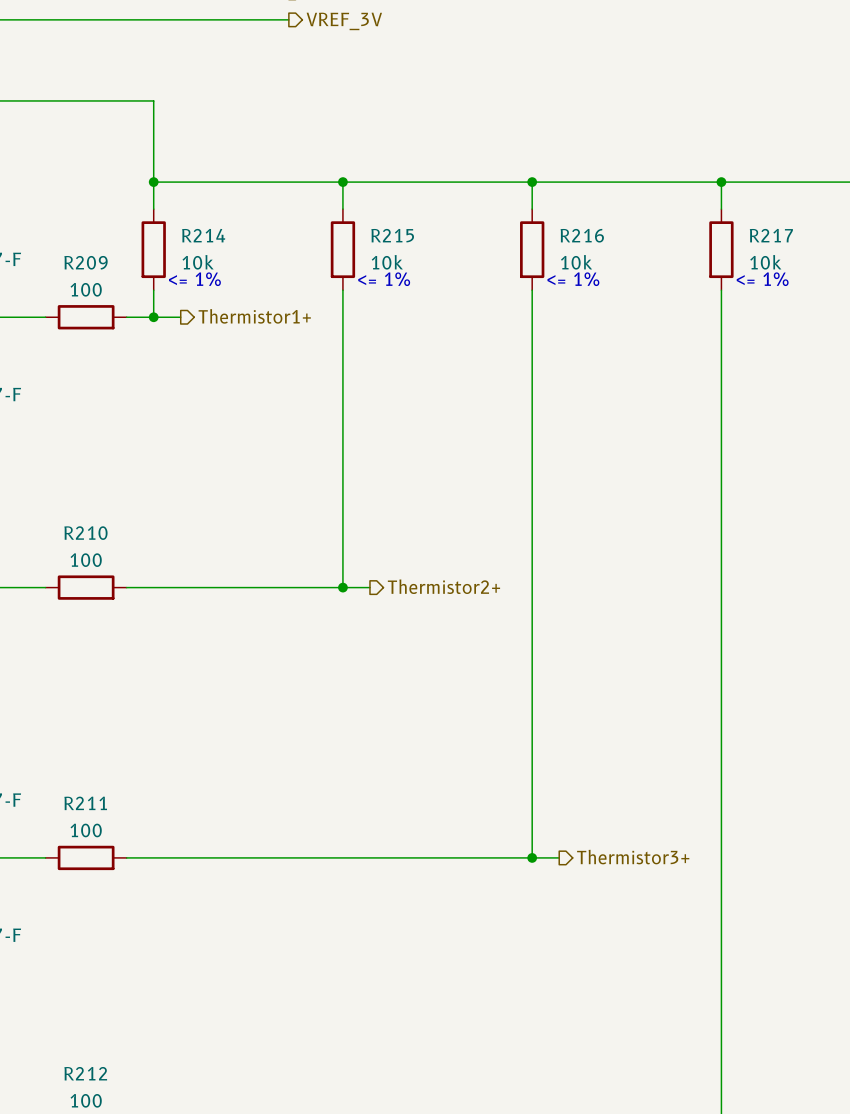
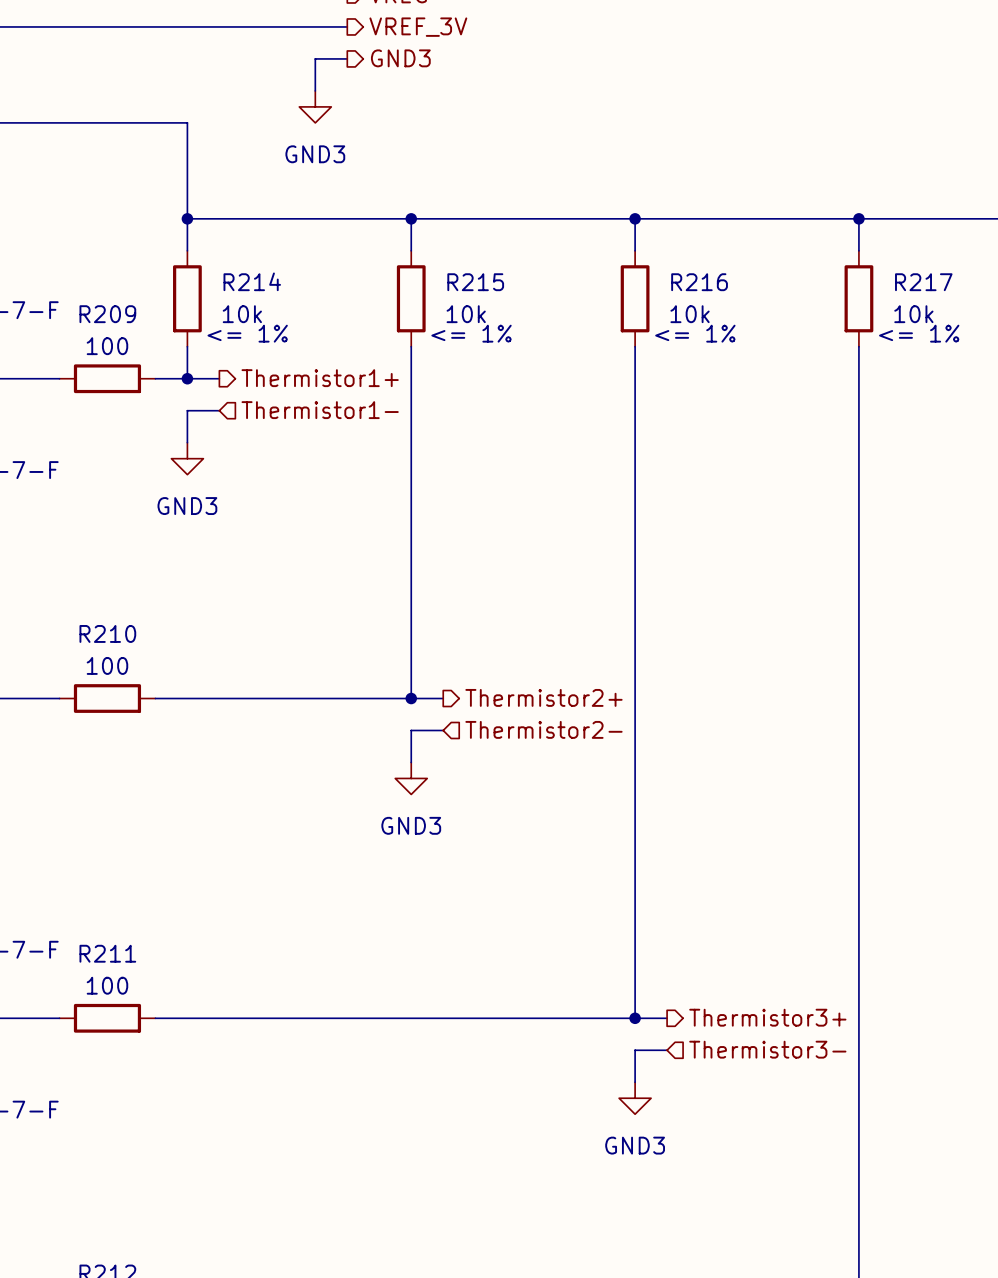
wire: none -> (347, 58) (315, 58) (315, 90)
hierarchical label: none -> GND3 (400, 58)
power symbol: none -> GND3 (315, 106)
hierarchical label: none -> Thermistor1- (320, 410)
wire: none -> (219, 410) (187, 410) (187, 442)
power symbol: none -> GND3 (187, 458)
hierarchical label: none -> Thermistor2- (543, 729)
wire: none -> (443, 730) (411, 730) (411, 762)
power symbol: none -> GND3 (411, 778)
wire: none -> (667, 1050) (635, 1050) (635, 1082)
hierarchical label: none -> Thermistor3- (767, 1049)
power symbol: none -> GND3 (635, 1098)

